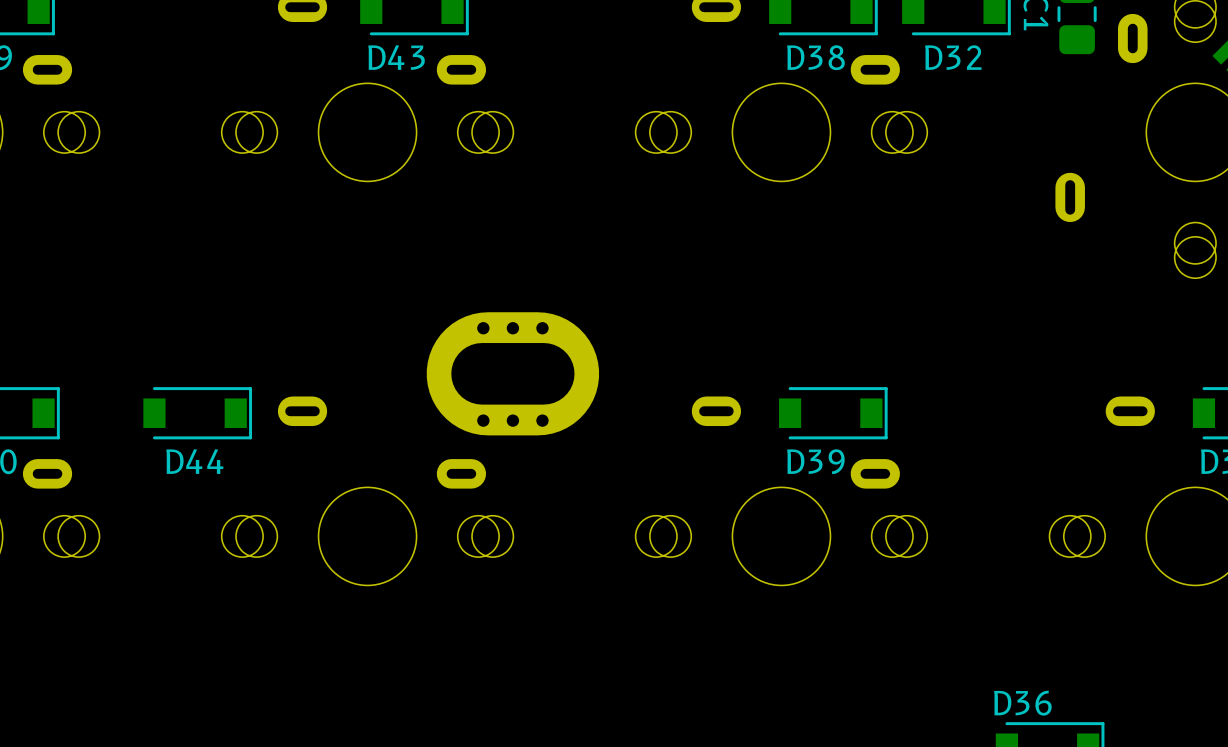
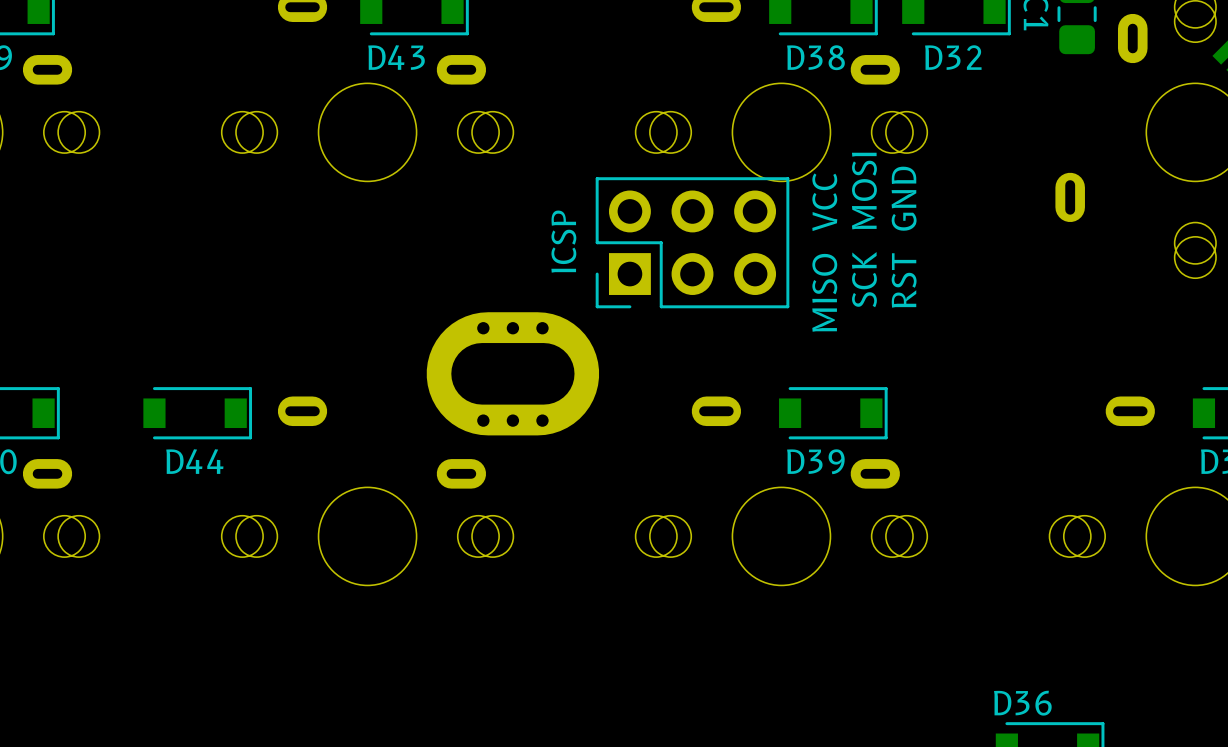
text: none -> MOSI (864, 191)
text: none -> GND (904, 198)
text: none -> VCC (824, 202)
part: none -> (692, 242)
text: none -> SCK (864, 279)
text: none -> RST (904, 280)
text: none -> MISO (824, 292)

